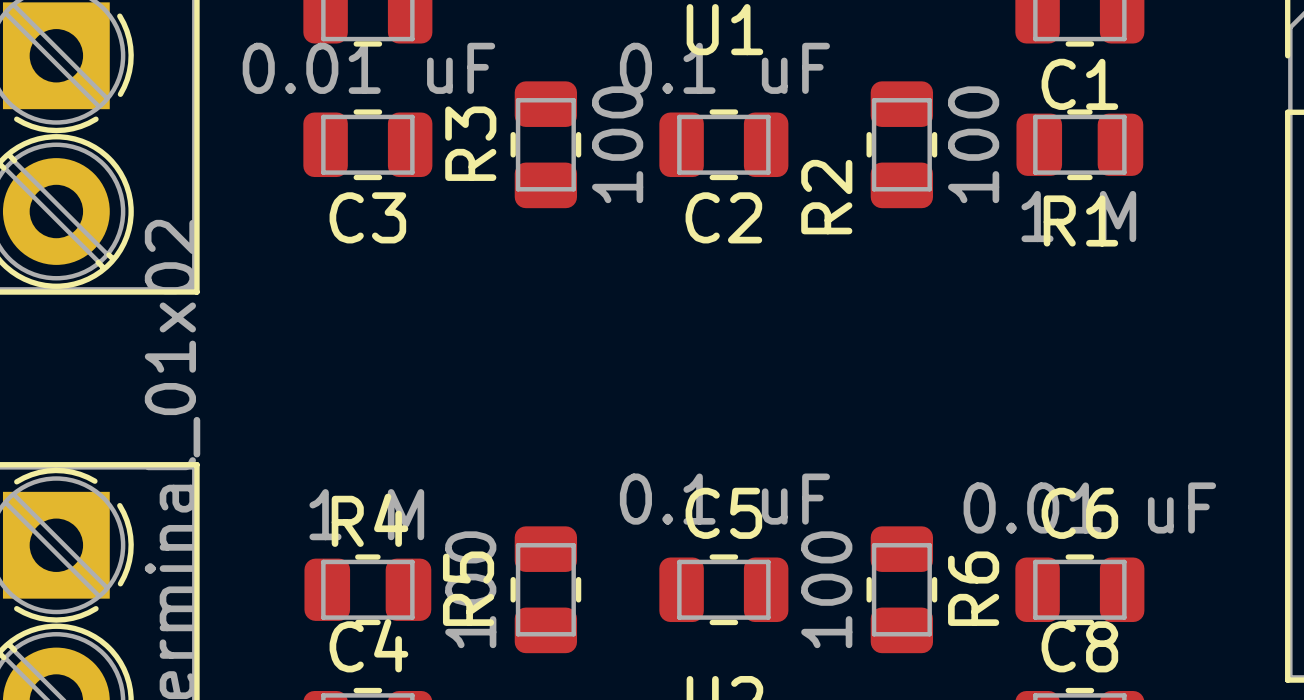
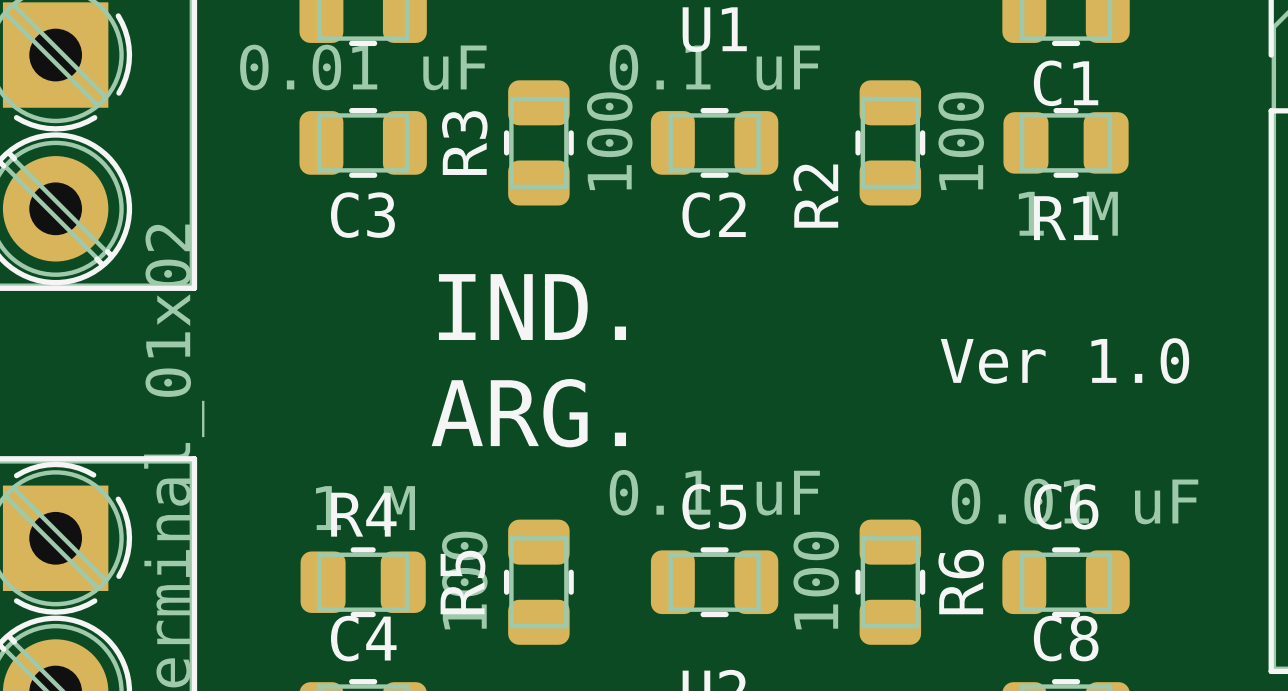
text: none -> IND. (532, 307)
text: none -> Ver 1.0 (1064, 360)
text: none -> ARG. (528, 413)

